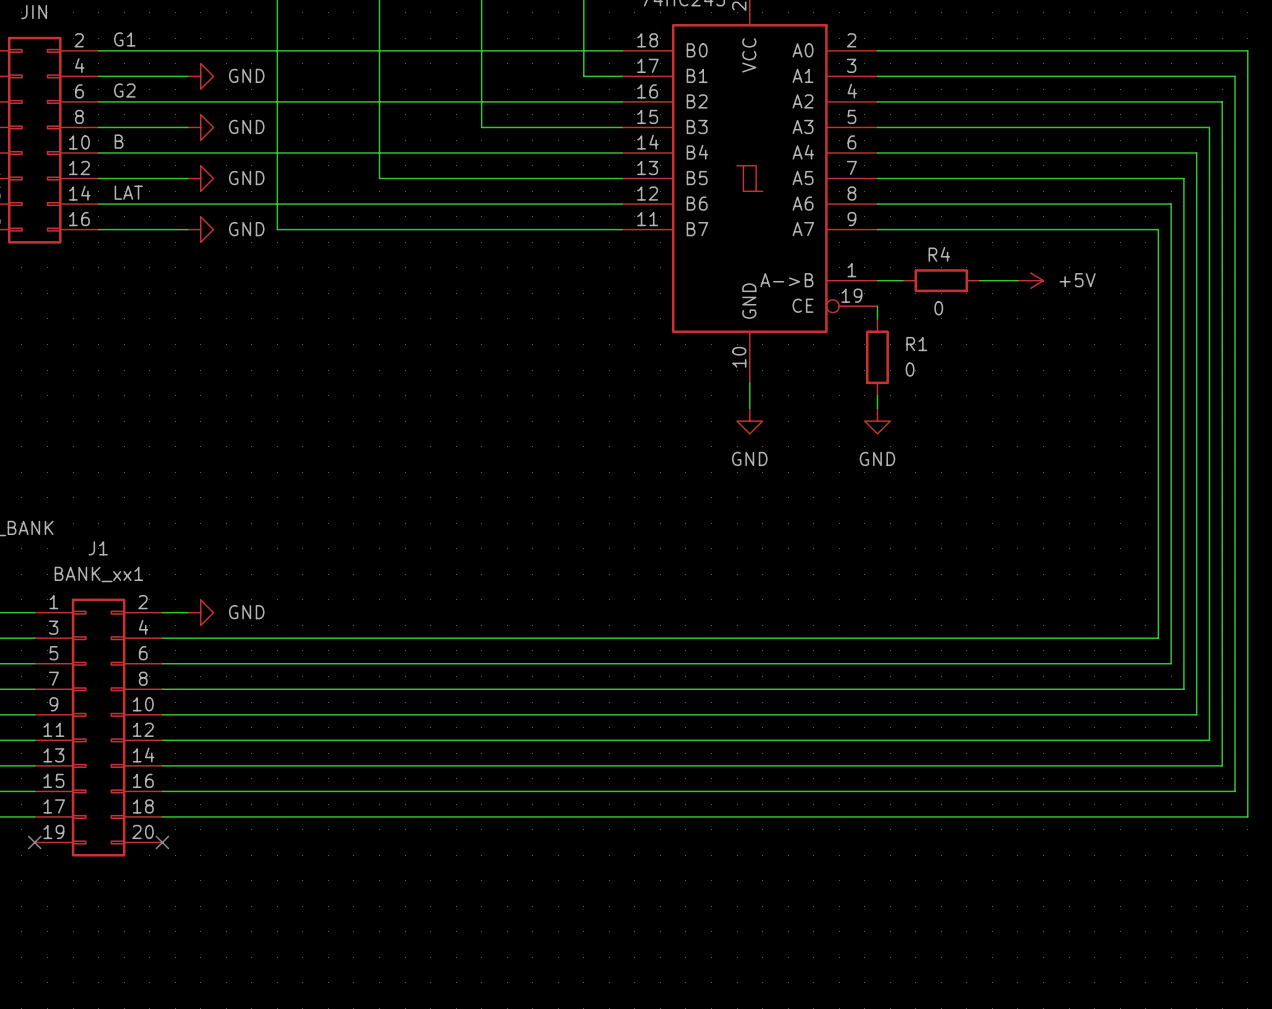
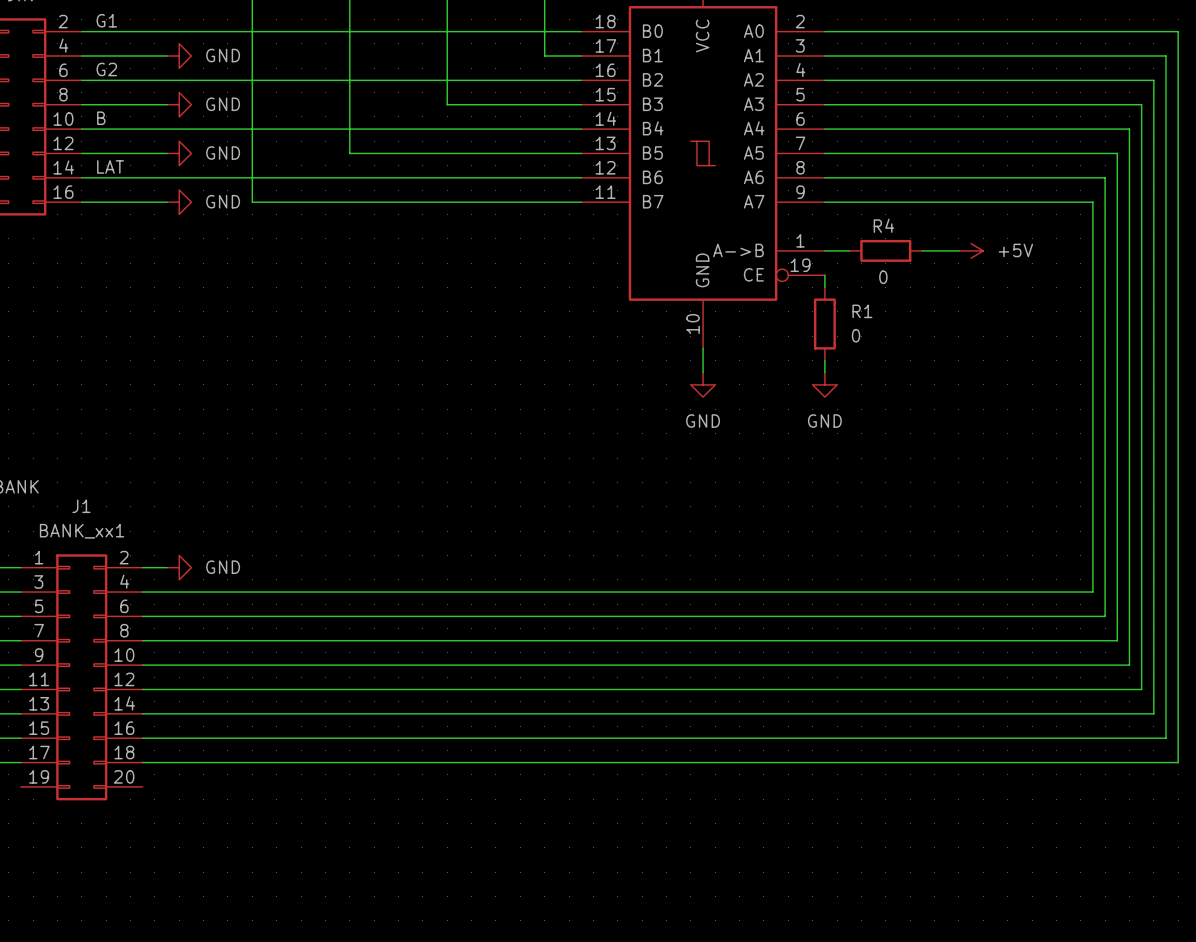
no-connect mark: (34, 842) -> none
no-connect mark: (162, 842) -> none

